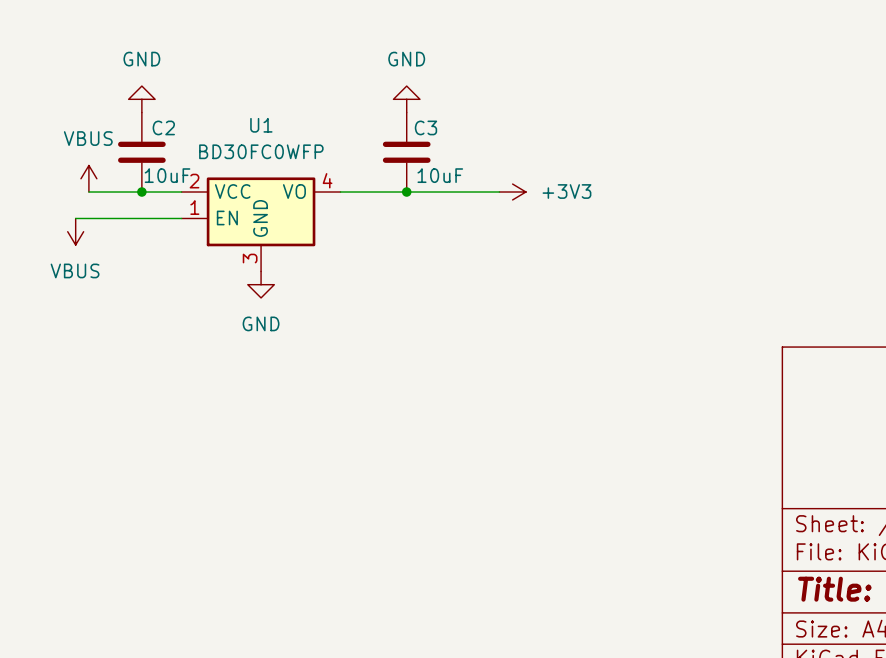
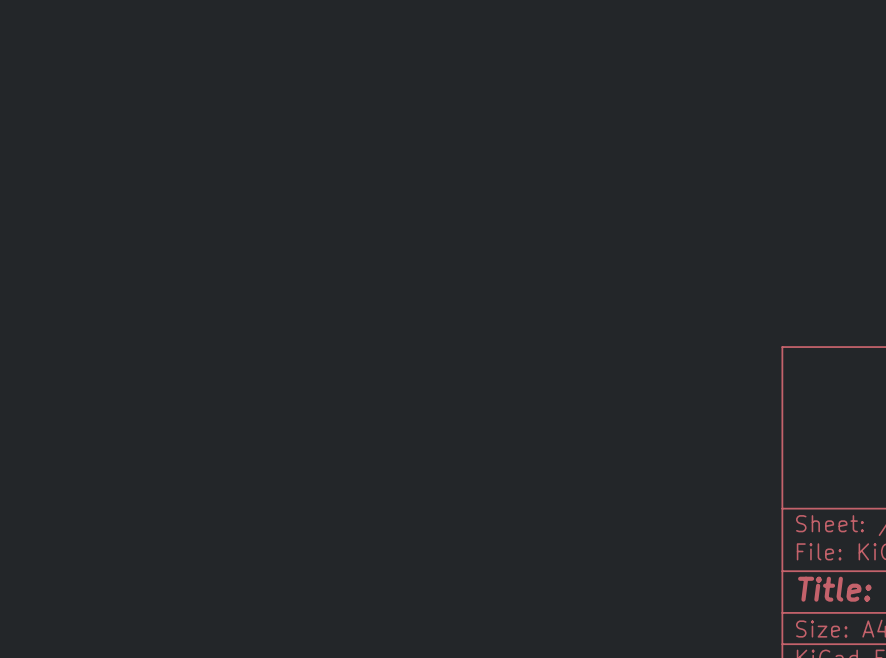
power symbol: GND (141, 99) -> none
power symbol: GND (406, 99) -> none
C2: 10uF (141, 152) -> none
C3: 10uF (406, 152) -> none
power symbol: VBUS (88, 178) -> none
wire: (88, 192) (181, 192) -> none
junction: (141, 192) -> none
wire: (340, 192) (499, 192) -> none
junction: (406, 192) -> none
power symbol: +3V3 (512, 192) -> none
wire: (75, 218) (181, 218) -> none
U1: BD30FC0WFP (261, 224) -> none
power symbol: VBUS (75, 231) -> none
power symbol: GND (261, 284) -> none

